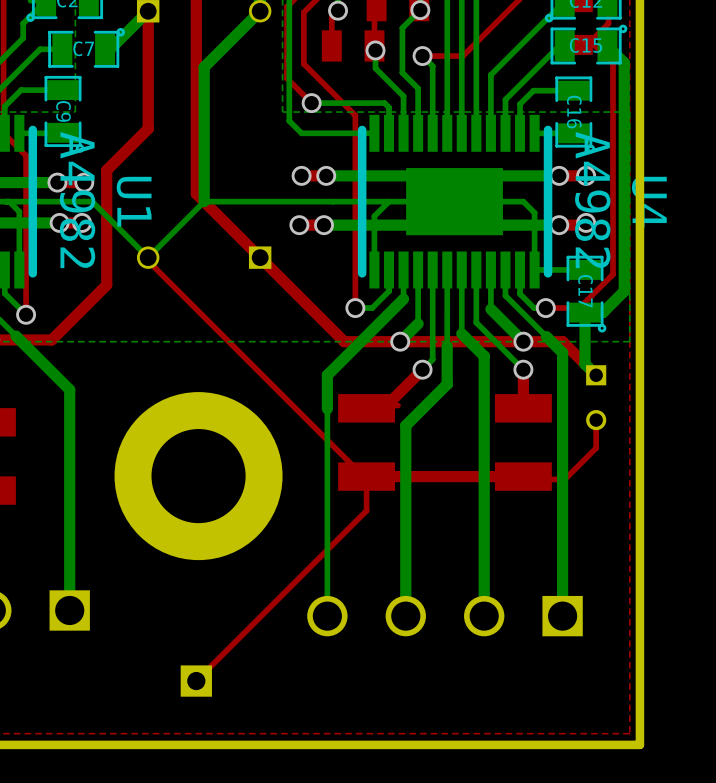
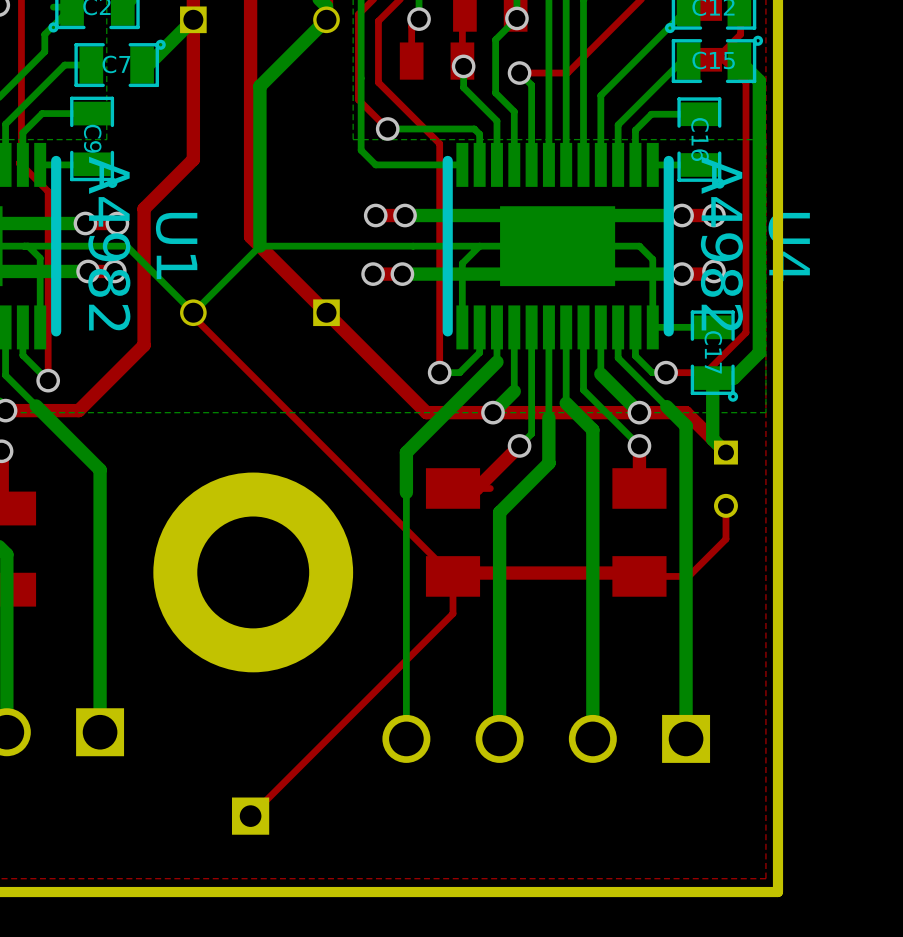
part footprint: [338, 394, 396, 491] -> [425, 468, 481, 597]
part footprint: [494, 394, 552, 491] -> [612, 468, 667, 597]

